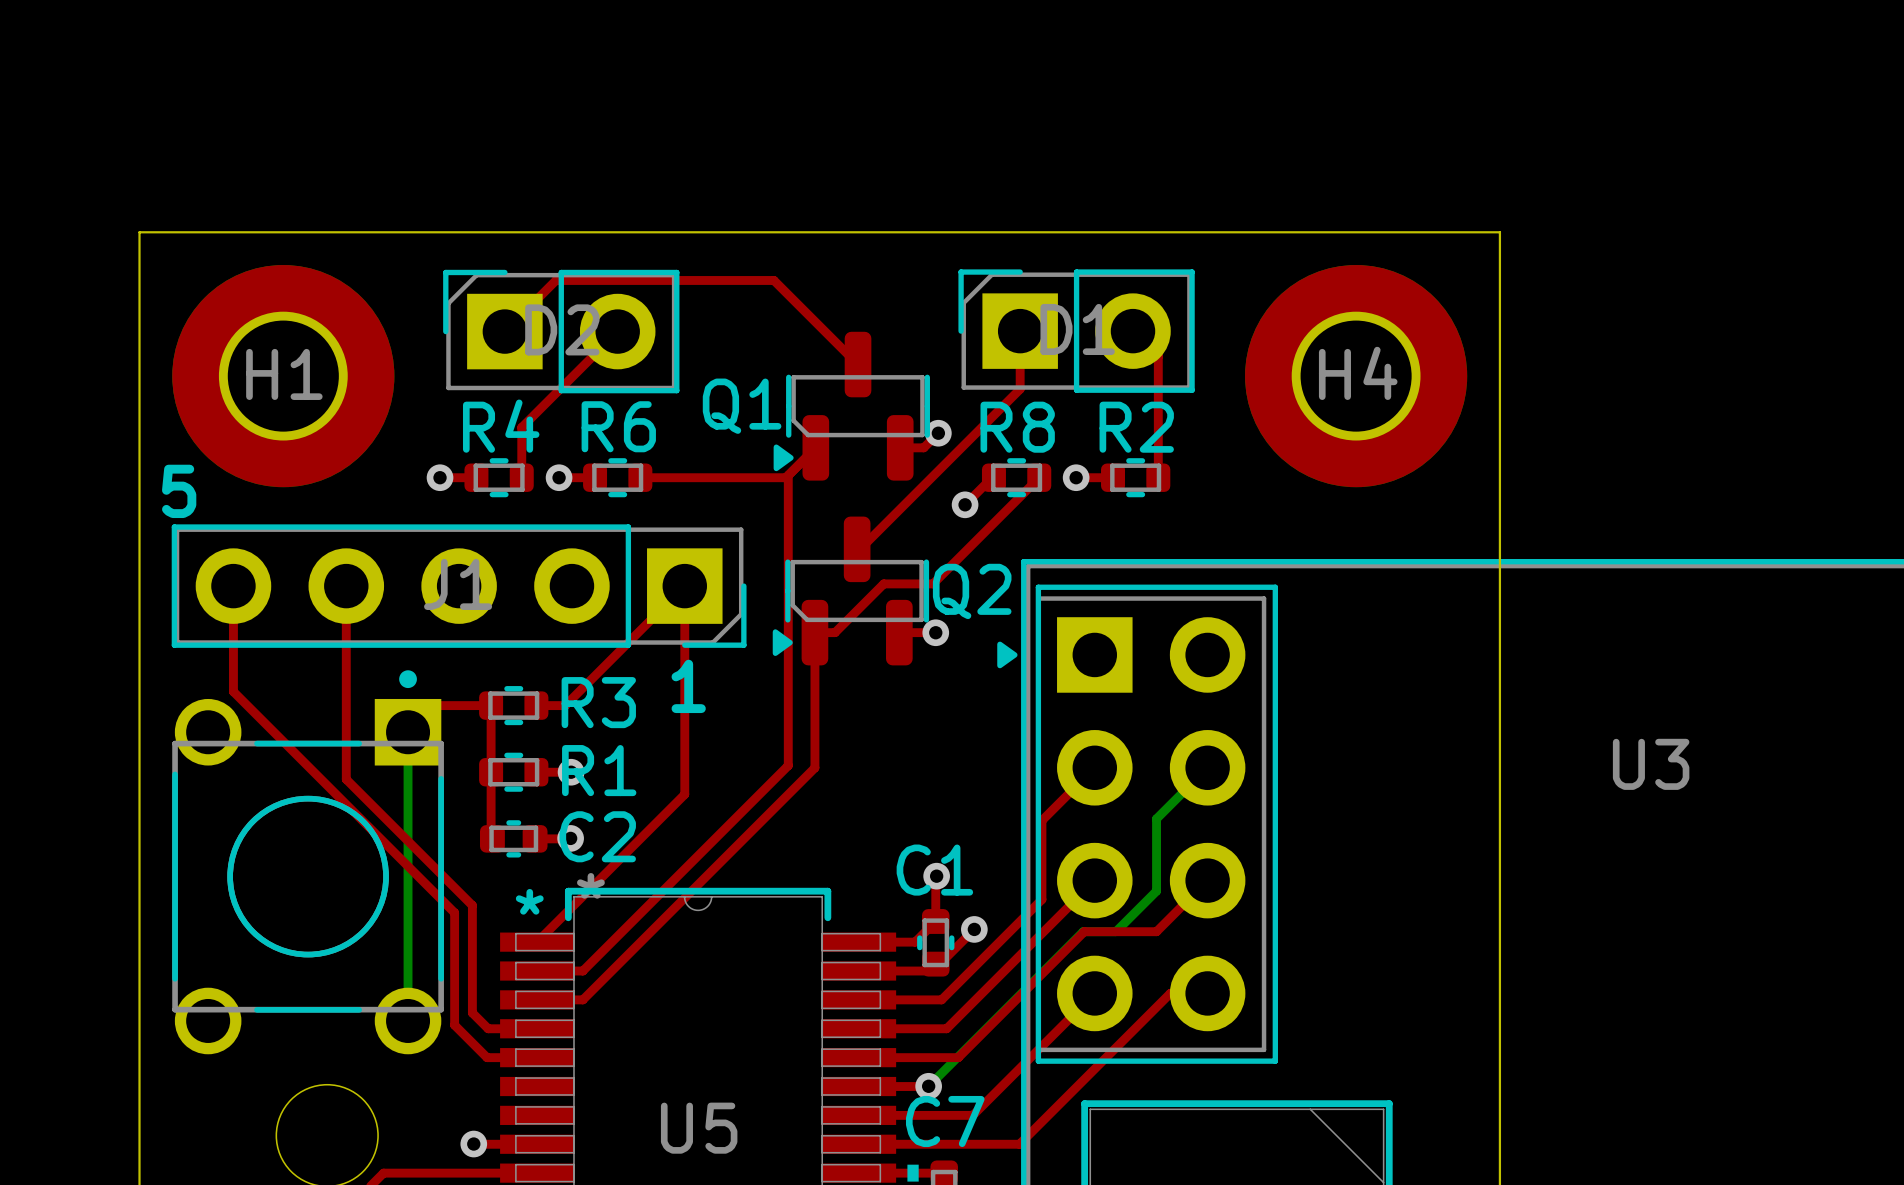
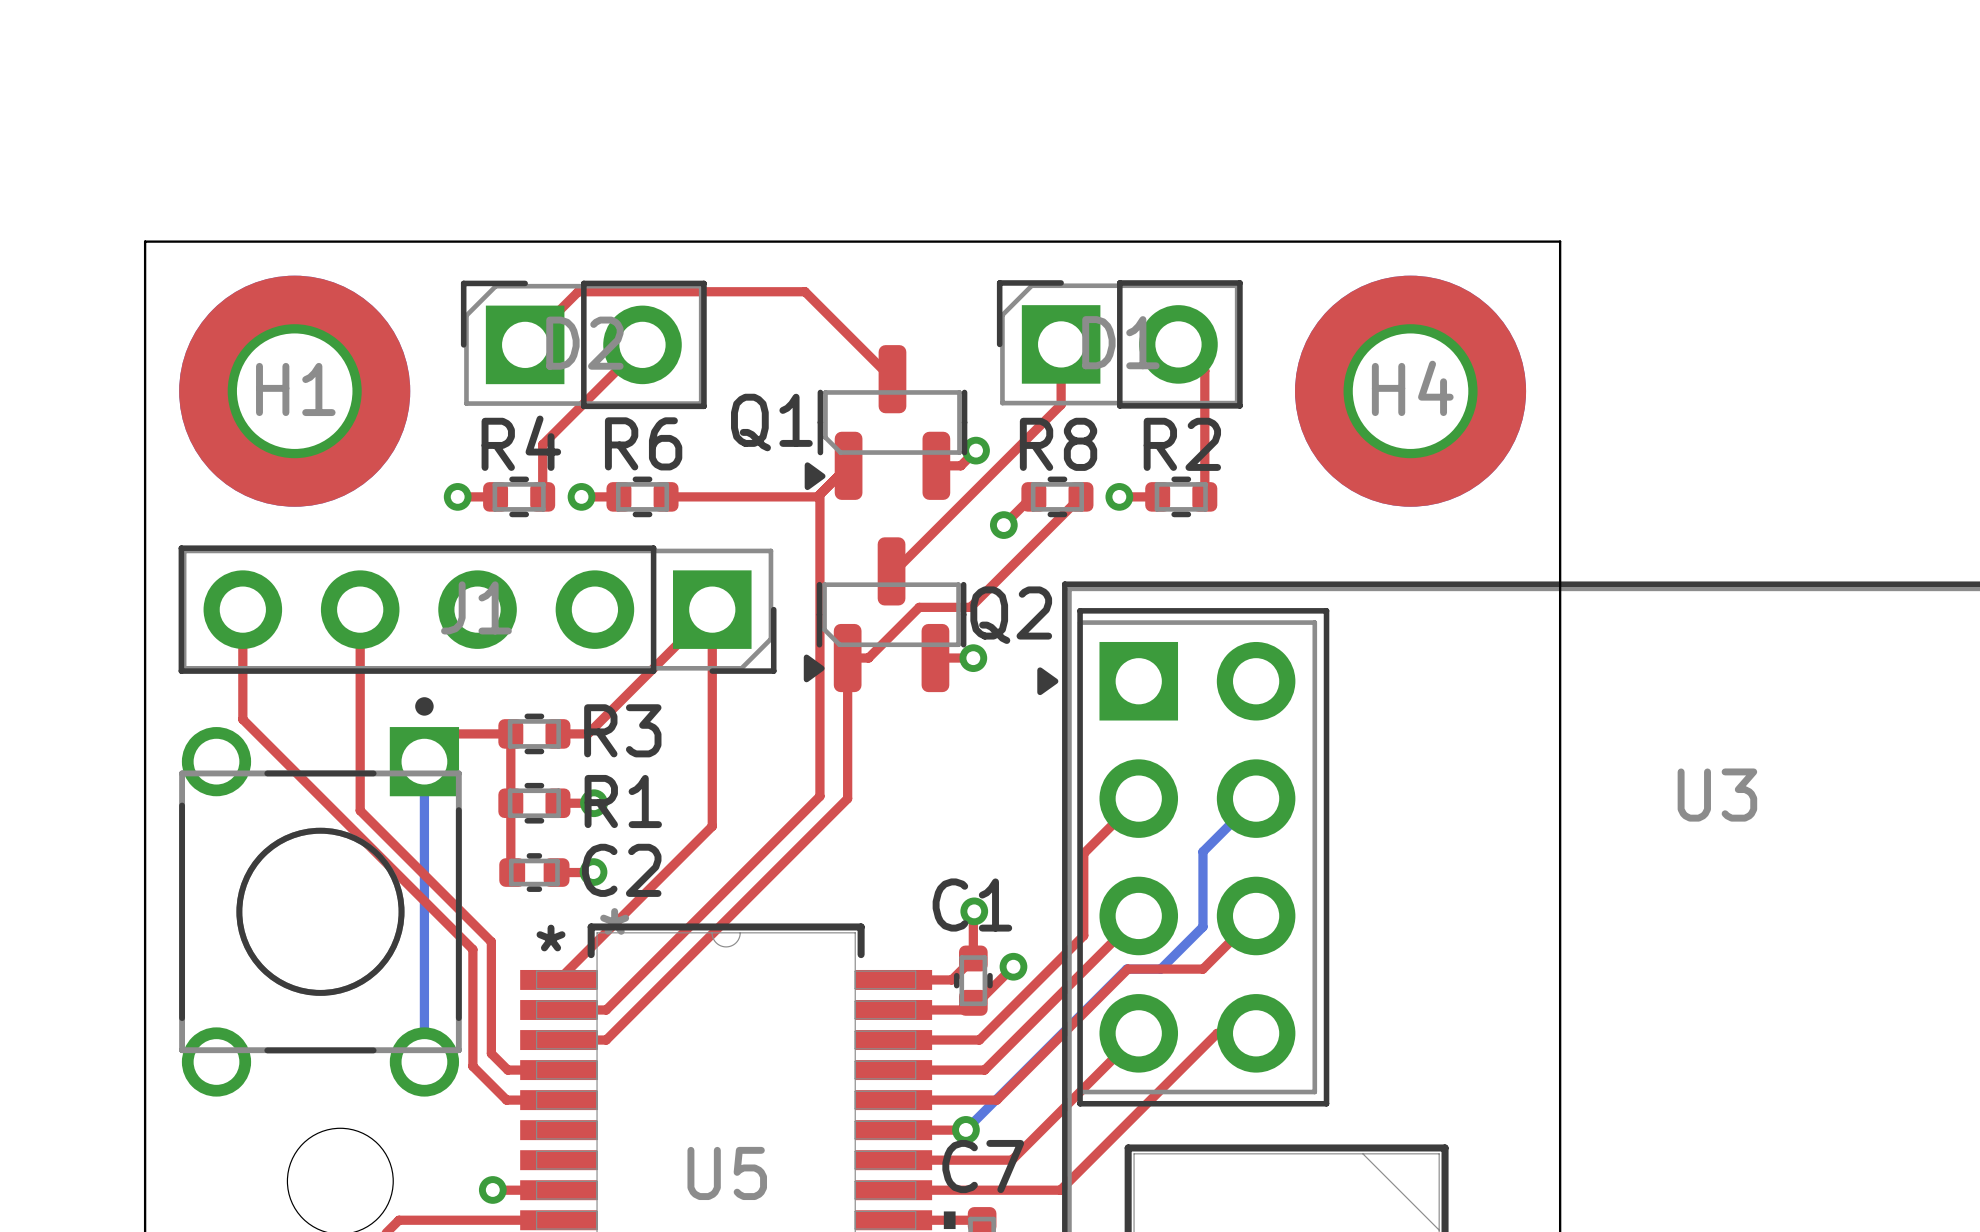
text: 5 (179, 491) -> none
text: 1 (688, 686) -> none

